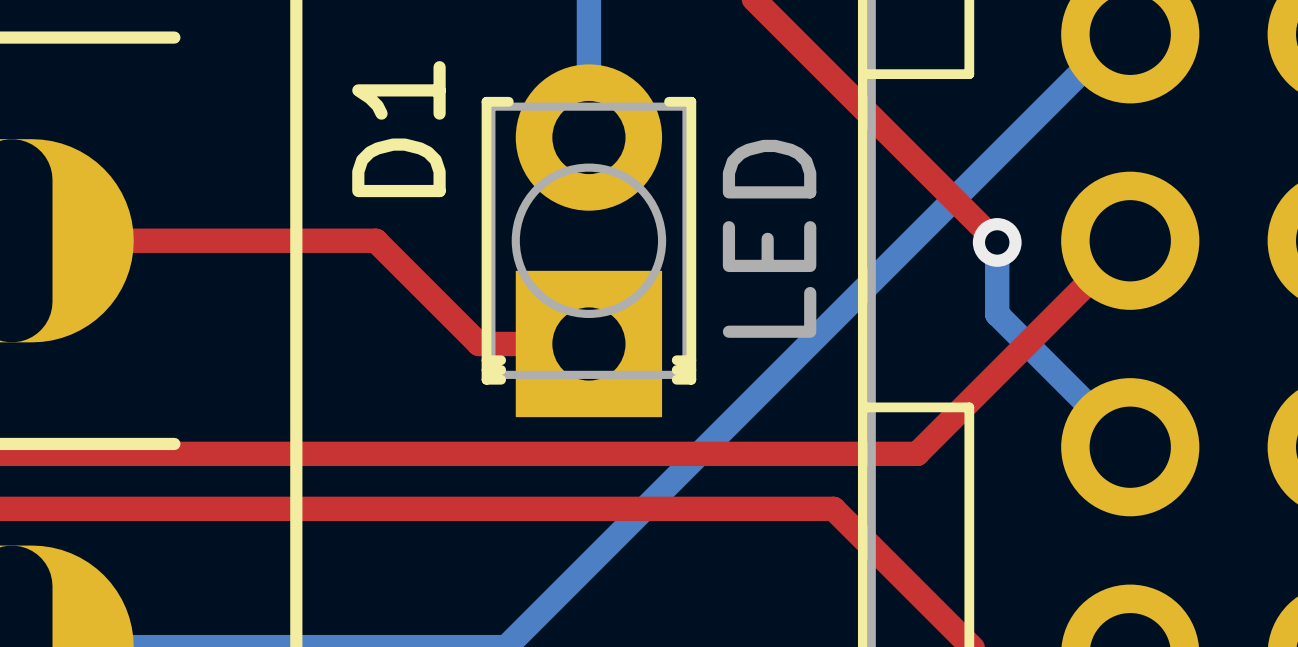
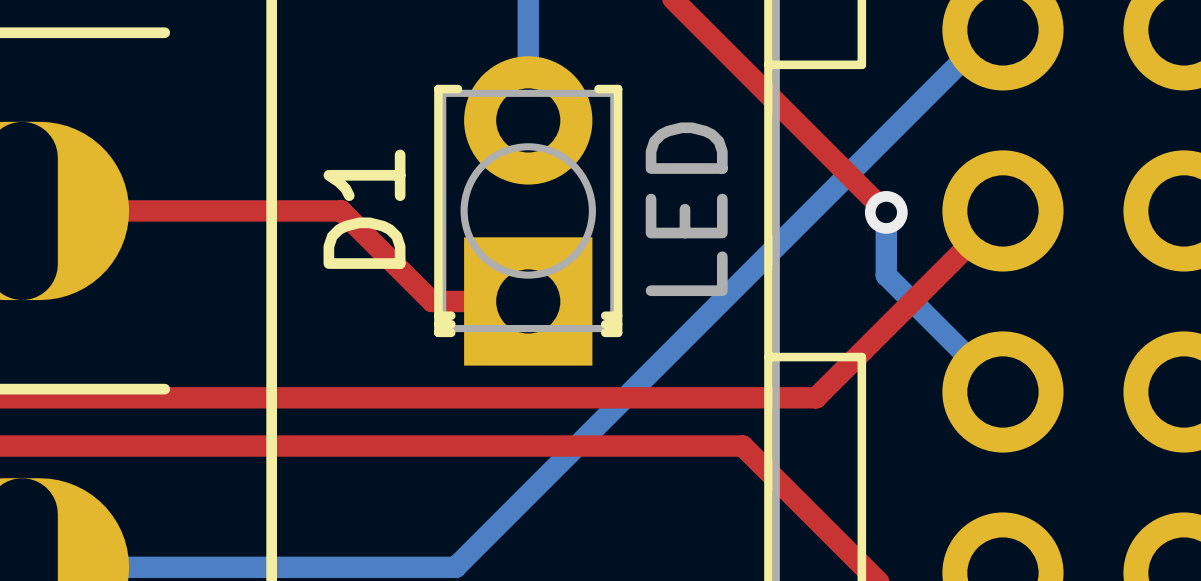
D1 name position: D1 (398, 129) -> D1 (364, 209)

